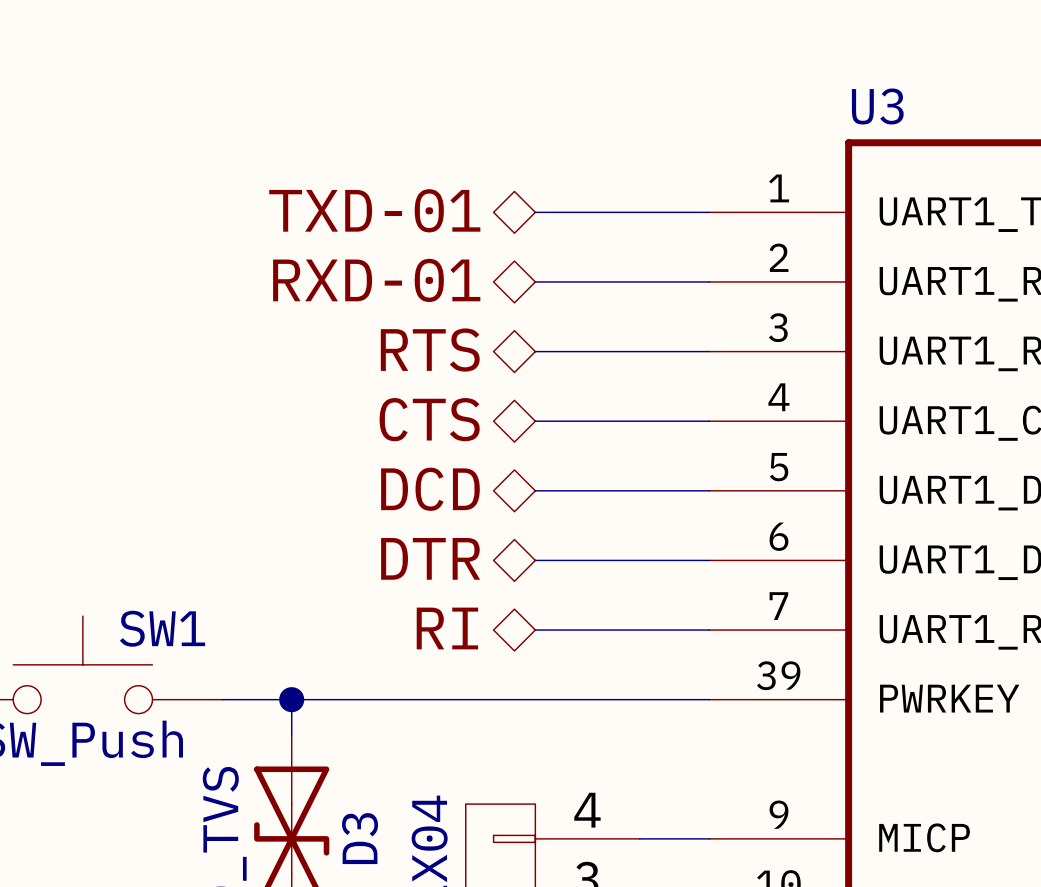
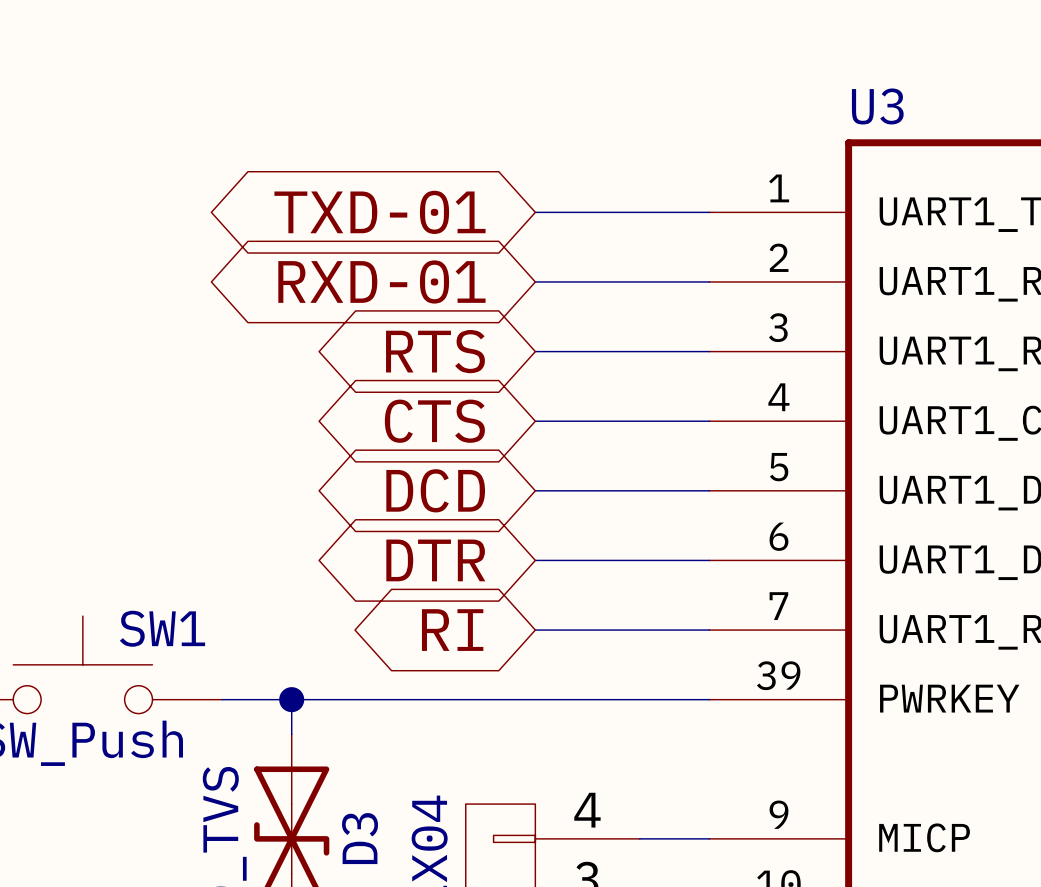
hierarchical label: TXD-01 (374, 210) -> none
global label: none -> TXD-01 (379, 212)
hierarchical label: RXD-01 (376, 280) -> none
global label: none -> RXD-01 (381, 281)
hierarchical label: RTS (430, 350) -> none
global label: none -> RTS (435, 351)
hierarchical label: CTS (429, 419) -> none
global label: none -> CTS (434, 421)
hierarchical label: DCD (430, 489) -> none
global label: none -> DCD (435, 490)
hierarchical label: DTR (430, 558) -> none
global label: none -> DTR (435, 560)
hierarchical label: RI (447, 628) -> none
global label: none -> RI (452, 630)

